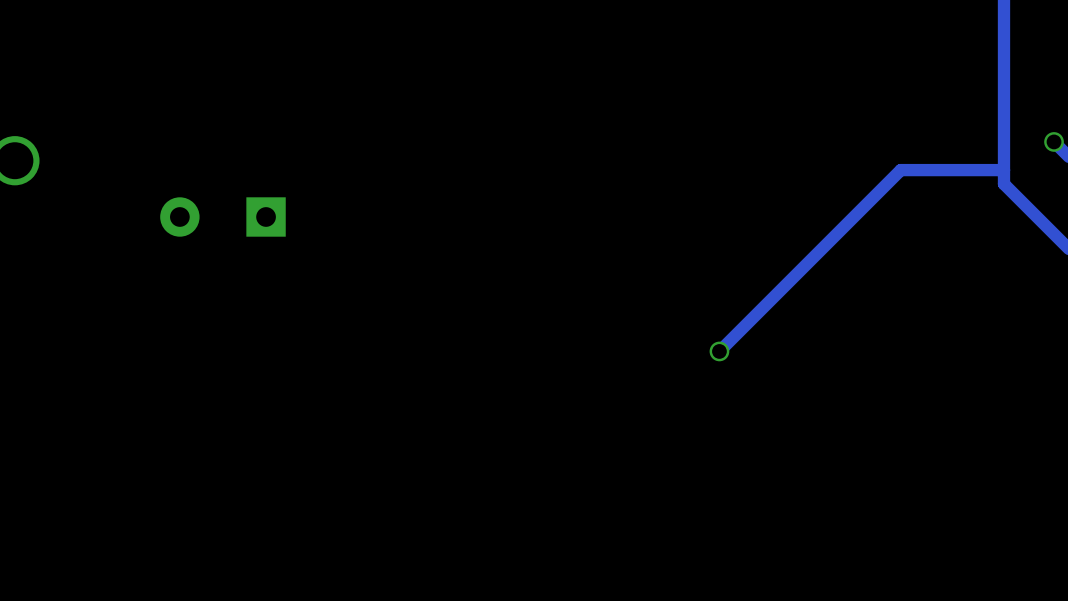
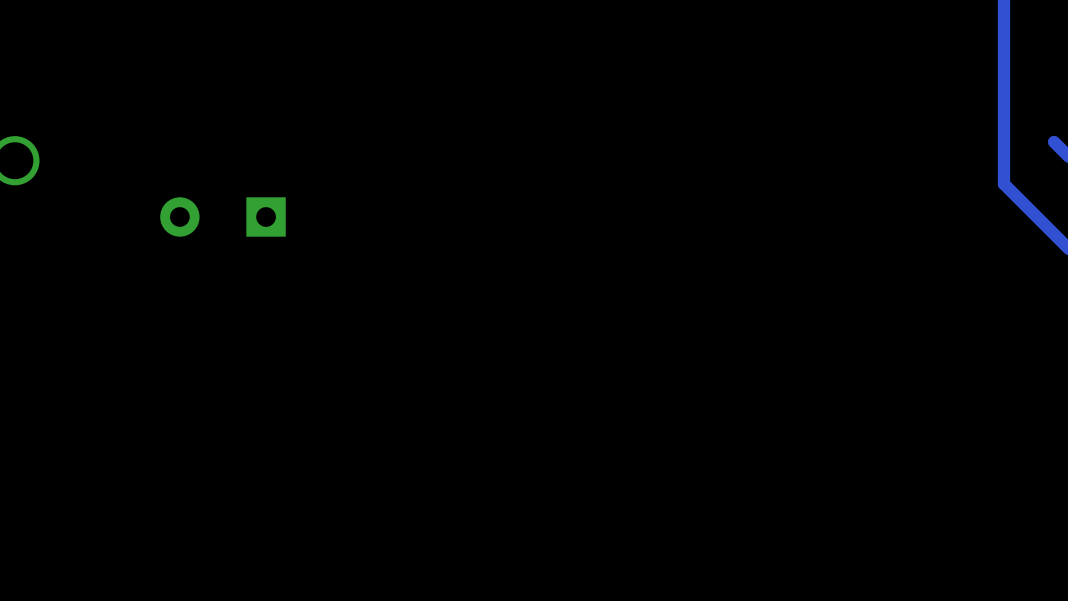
via: (1054, 141) -> none
track: (1003, 170) (900, 170) (719, 351) -> none
via: (719, 351) -> none

